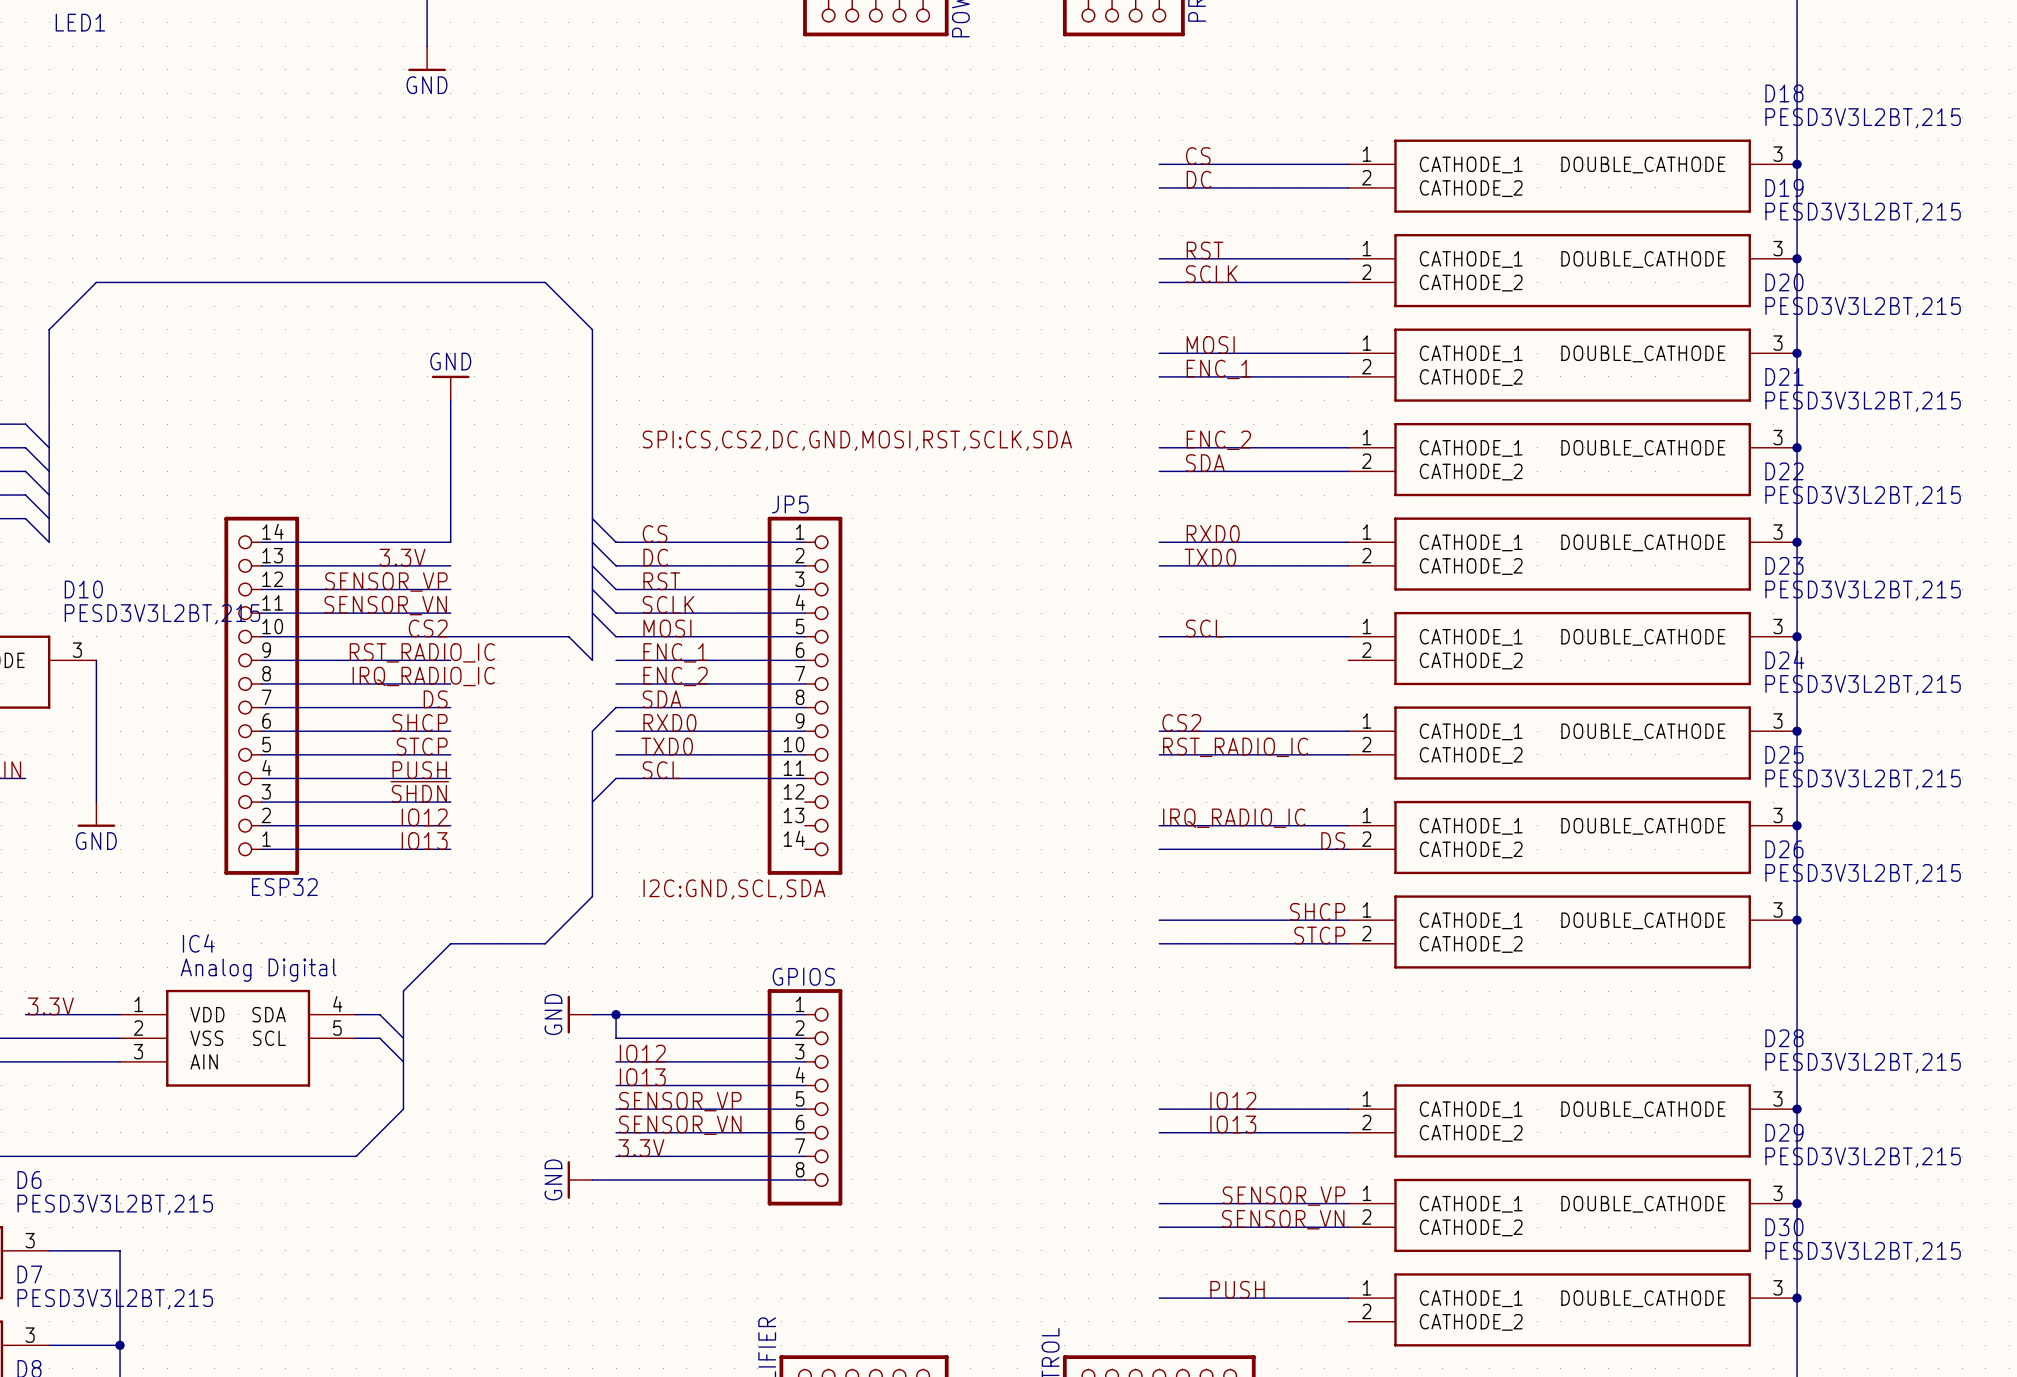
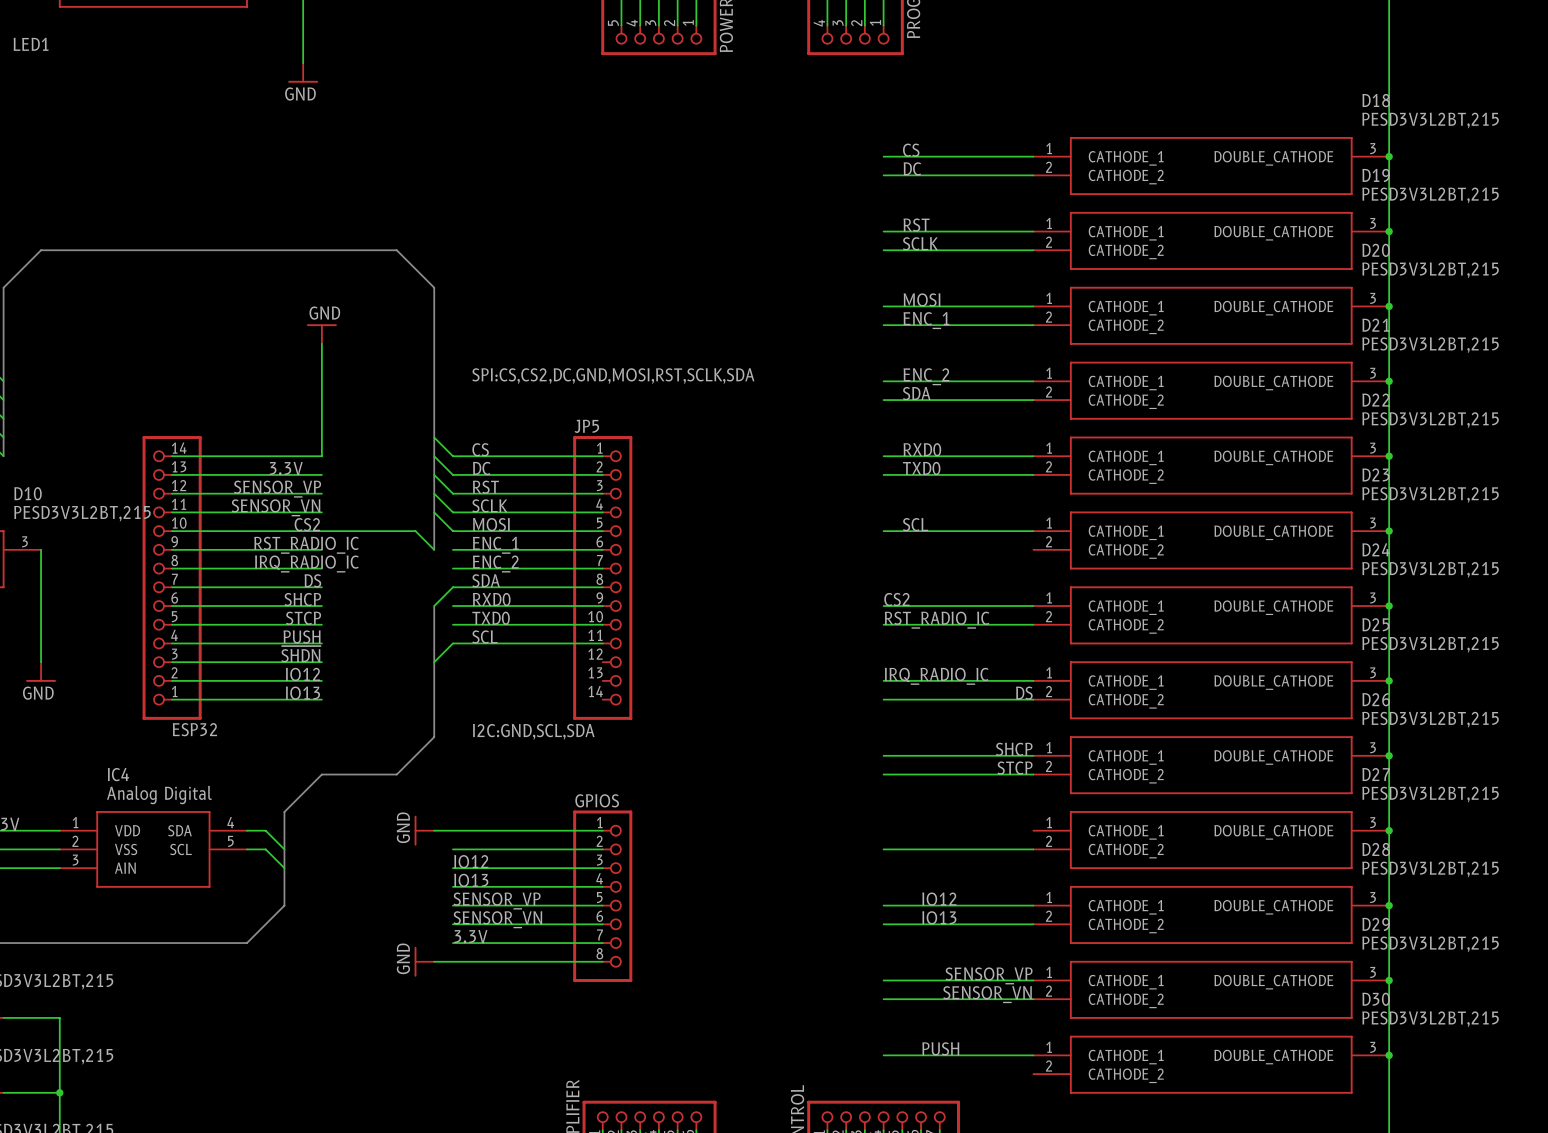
wire: (616, 1014) (616, 1038) -> none
junction: (616, 1014) -> none
junction: none -> (1389, 830)
D27: none -> PESD3V3L2BT,215 (1211, 840)
wire: none -> (883, 849) (1033, 849)

